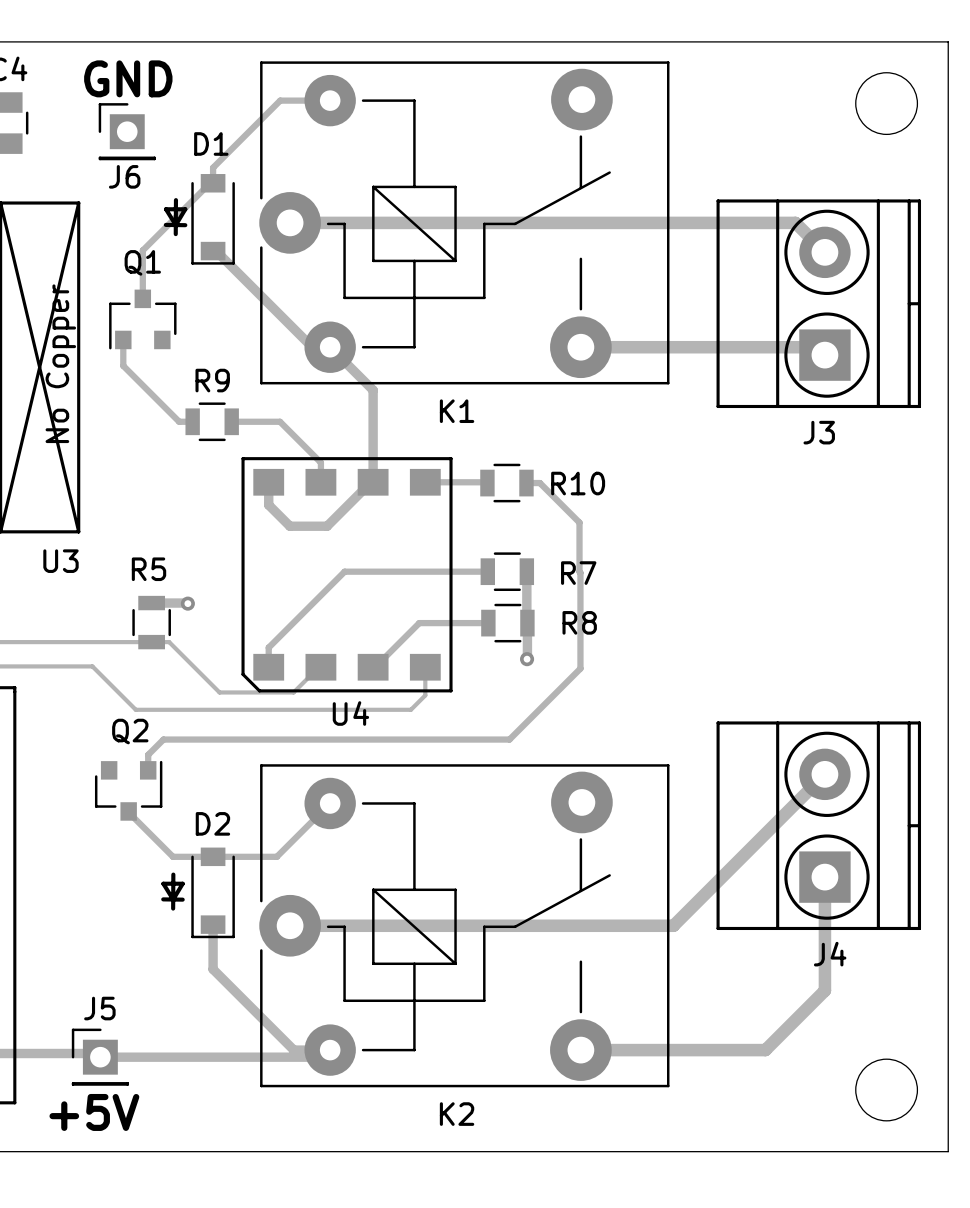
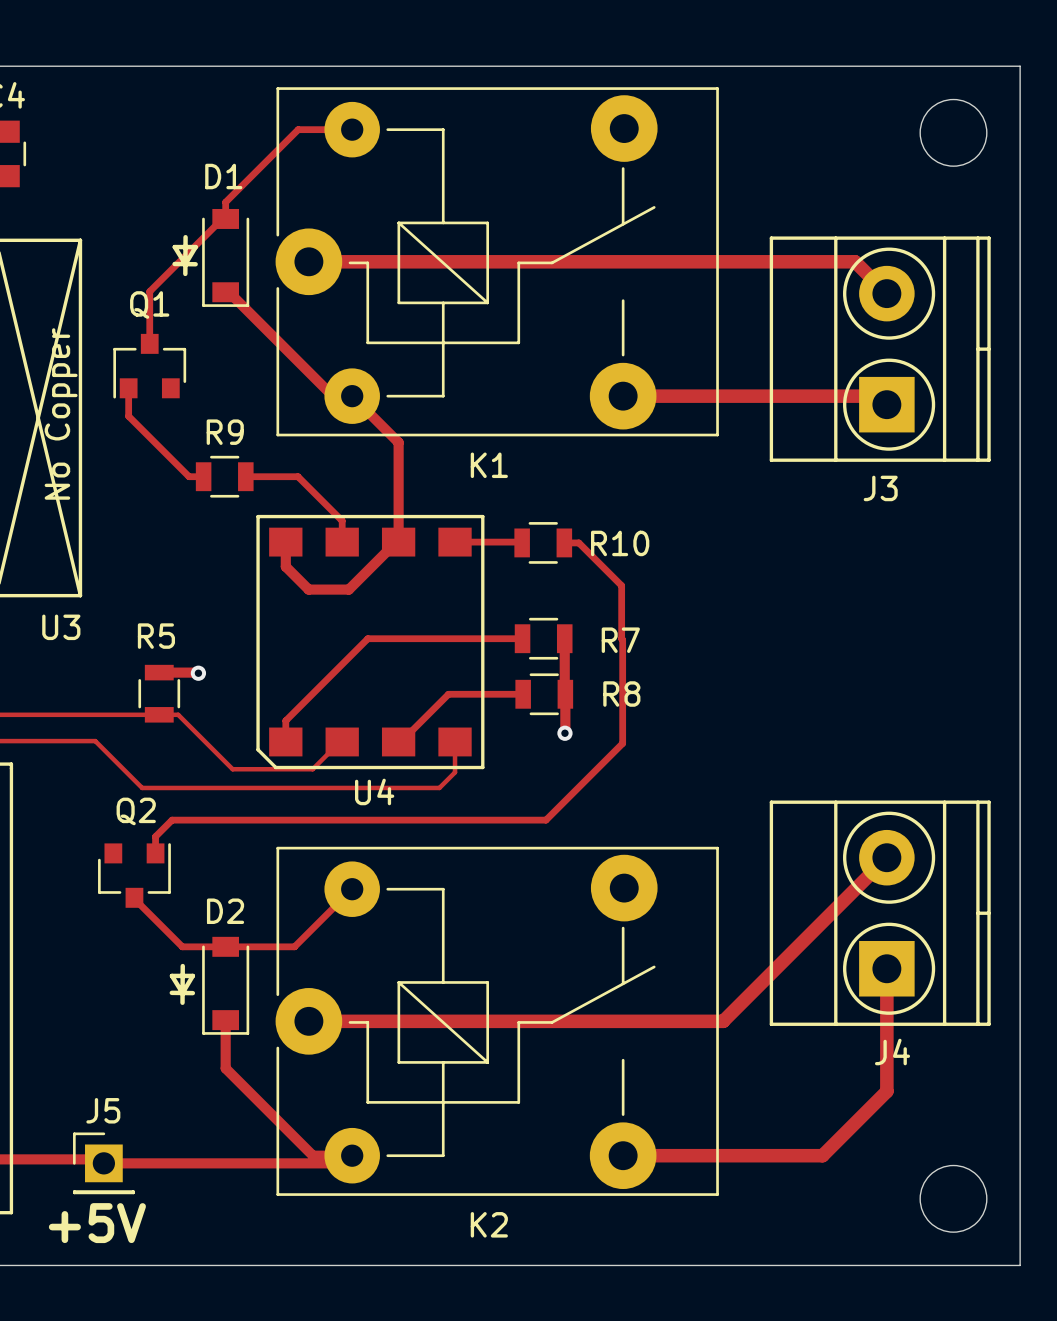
text: GND (128, 78) -> none
J6: (127, 131) -> none

